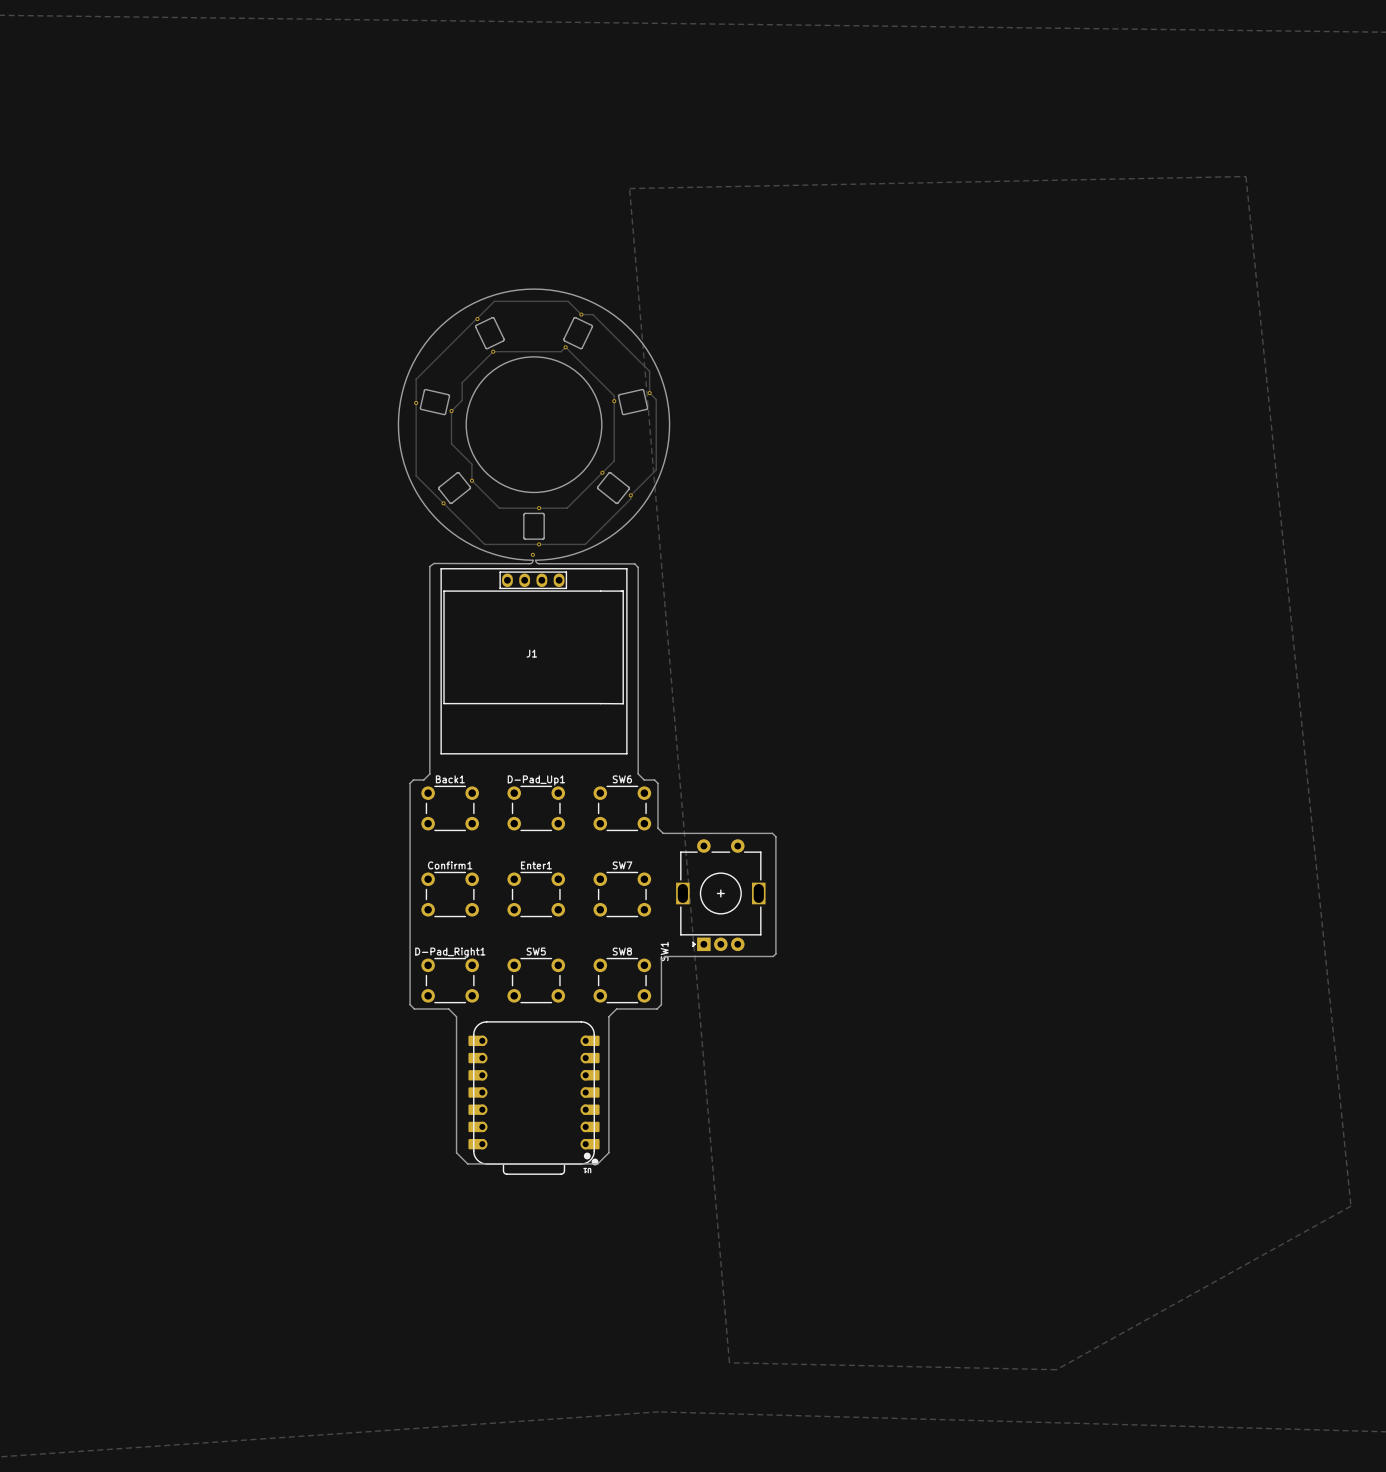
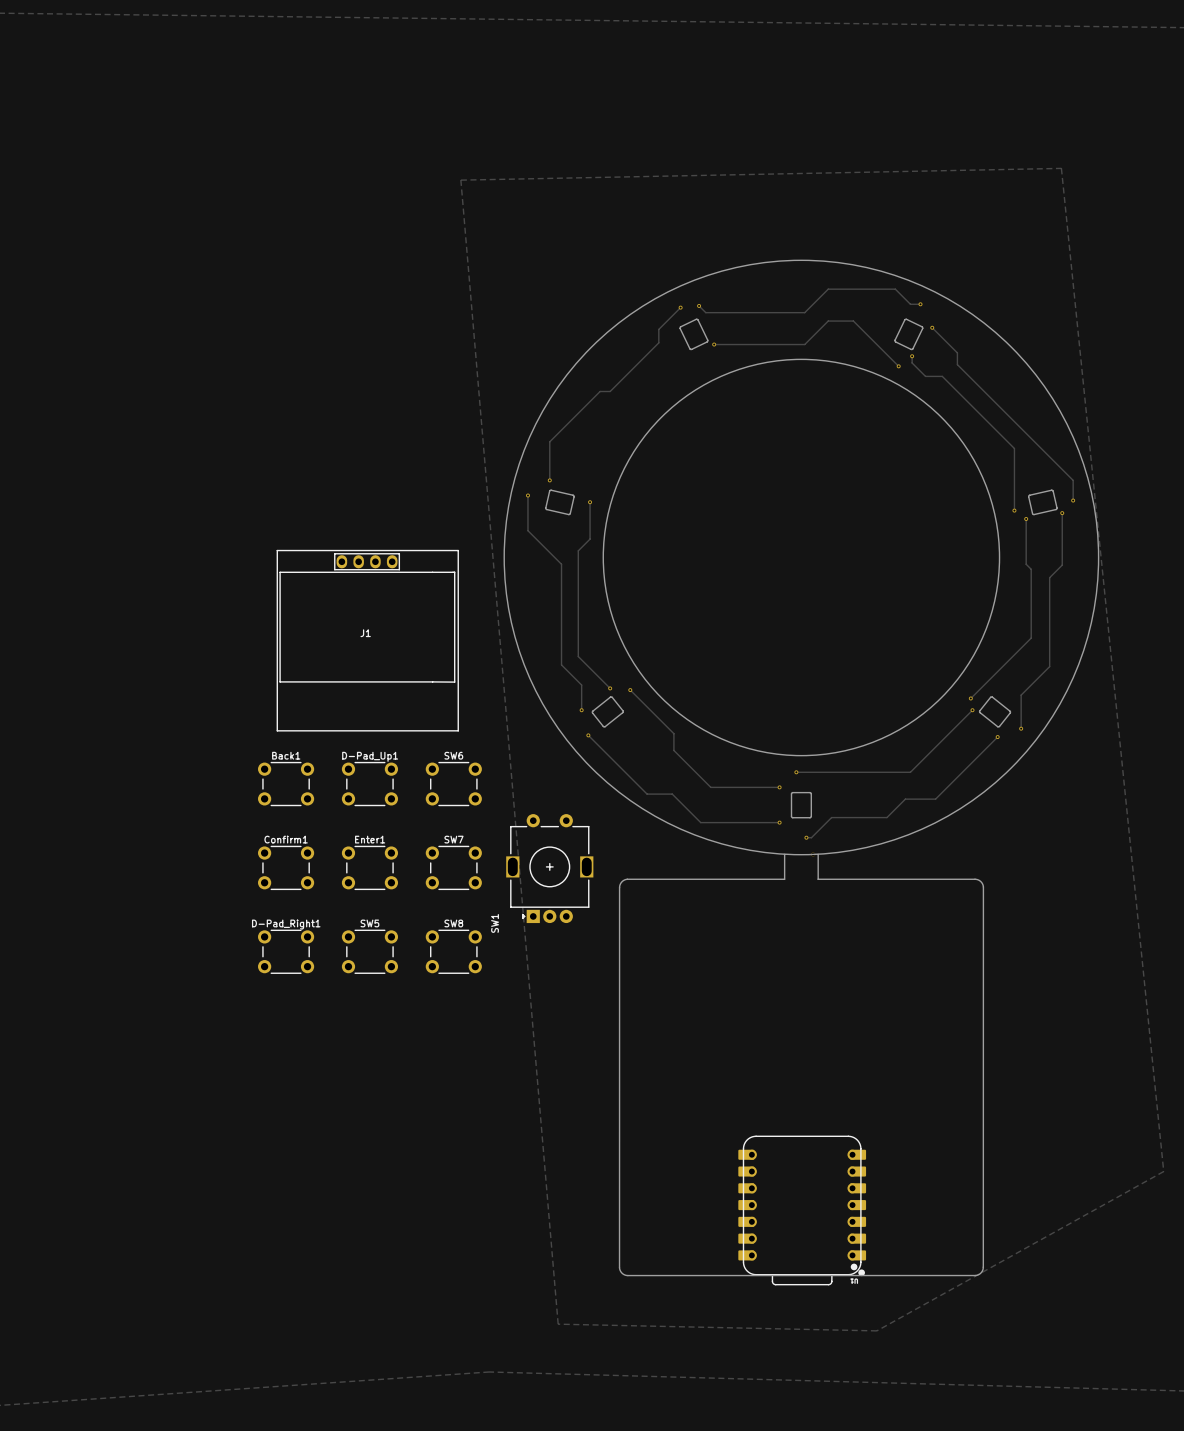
round board edge: none -> [504, 260, 1099, 855]
track: (494, 301) (416, 379) (416, 475) (484, 544) (585, 544) (630, 498) (630, 495) (656, 469) (656, 399) (649, 393) (649, 371) (592, 314) (581, 314) (568, 301) (494, 301) -> none
via: (581, 314) -> none
track: none -> (920, 304) (910, 304) (895, 289) (828, 289) (804, 312) (705, 312) (699, 305)
via: none -> (920, 304)
via: none -> (699, 305)
via: (477, 319) -> none
track: none -> (680, 307) (658, 329) (658, 342) (610, 391) (600, 391) (549, 441) (549, 480)
via: none -> (680, 307)
part: (489, 333) -> none
part: (578, 333) -> none
track: none -> (932, 327) (957, 352) (957, 364) (1073, 480) (1073, 500)
via: none -> (932, 327)
part: none -> (693, 334)
part: none -> (908, 334)
track: (565, 347) (614, 395) (614, 460) (567, 508) (499, 508) (471, 480) (471, 464) (451, 443) (451, 411) (462, 400) (462, 382) (493, 351) (561, 351) (565, 347) -> none
via: (565, 347) -> none
via: (493, 351) -> none
round board edge: [466, 356, 602, 493] -> none
track: none -> (714, 344) (804, 344) (828, 321) (853, 321) (898, 366)
via: none -> (714, 344)
track: none -> (912, 356) (912, 362) (925, 376) (942, 376) (1014, 448) (1014, 510)
via: none -> (912, 356)
round board edge: none -> [603, 359, 1000, 756]
via: none -> (898, 366)
via: (649, 393) -> none
via: (614, 401) -> none
via: (416, 402) -> none
part: (434, 402) -> none
part: (633, 402) -> none
via: (451, 411) -> none
via: (602, 472) -> none
via: (471, 480) -> none
part: (454, 488) -> none
part: (613, 488) -> none
via: (630, 495) -> none
via: none -> (549, 480)
via: (443, 503) -> none
via: (539, 508) -> none
track: none -> (527, 495) (527, 530) (561, 564) (561, 664) (581, 685) (581, 710)
via: none -> (527, 495)
via: none -> (1073, 500)
part: none -> (559, 502)
track: none -> (590, 502) (590, 539) (578, 550) (578, 656) (610, 688)
via: none -> (590, 502)
part: none -> (1042, 502)
part: (534, 526) -> none
via: none -> (1014, 510)
track: none -> (1062, 513) (1062, 565) (1049, 577) (1049, 666) (1021, 695) (1021, 728)
via: none -> (1062, 513)
track: none -> (1026, 518) (1026, 564) (1031, 569) (1031, 638) (970, 698)
via: none -> (1026, 518)
via: (539, 544) -> none
via: (532, 554) -> none
board edge: (535, 560) (559, 557) (589, 548) (616, 532) (633, 516) (652, 491) (661, 469) (667, 447) (669, 423) (667, 400) (661, 377) (646, 349) (632, 331) (614, 315) (587, 299) (557, 291) (533, 289) (510, 291) (480, 300) (459, 311) (440, 326) (425, 343) (412, 363) (402, 393) (398, 416) (399, 440) (406, 470) (416, 492) (435, 517) (458, 537) (479, 548) (509, 558) (533, 560) (529, 563) (434, 563) (429, 566) (429, 773) (423, 780) (413, 780) (410, 783) (410, 1004) (414, 1008) (448, 1008) (456, 1016) (456, 1152) (467, 1163) (597, 1163) (608, 1152) (608, 1016) (616, 1008) (657, 1008) (661, 1004) (661, 959) (664, 956) (773, 956) (775, 953) (775, 836) (772, 833) (663, 833) (657, 828) (657, 783) (654, 780) (644, 780) (638, 773) (638, 567) (634, 563) (539, 563) (535, 560) -> none
via: none -> (610, 688)
track: none -> (630, 690) (673, 733) (673, 750) (710, 787) (779, 787)
via: none -> (630, 690)
via: none -> (970, 698)
via: none -> (581, 710)
track: none -> (972, 710) (910, 772) (796, 772)
via: none -> (972, 710)
part: none -> (607, 711)
part: none -> (995, 711)
via: none -> (1021, 728)
track: none -> (588, 735) (647, 794) (672, 794) (700, 822) (779, 822)
via: none -> (588, 735)
track: none -> (997, 737) (935, 799) (905, 799) (886, 817) (831, 817) (811, 837) (806, 837)
via: none -> (997, 737)
via: none -> (796, 772)
via: none -> (779, 787)
part: none -> (801, 805)
via: none -> (779, 822)
via: none -> (806, 837)
board edge: none -> (784, 854) (784, 879) (627, 879) (620, 884) (620, 1270) (627, 1275) (975, 1275)
board edge: none -> (818, 854) (818, 879) (975, 879) (979, 880) (982, 884) (983, 1267) (981, 1272) (975, 1275)
part position: (534, 1098) -> (802, 1210)

